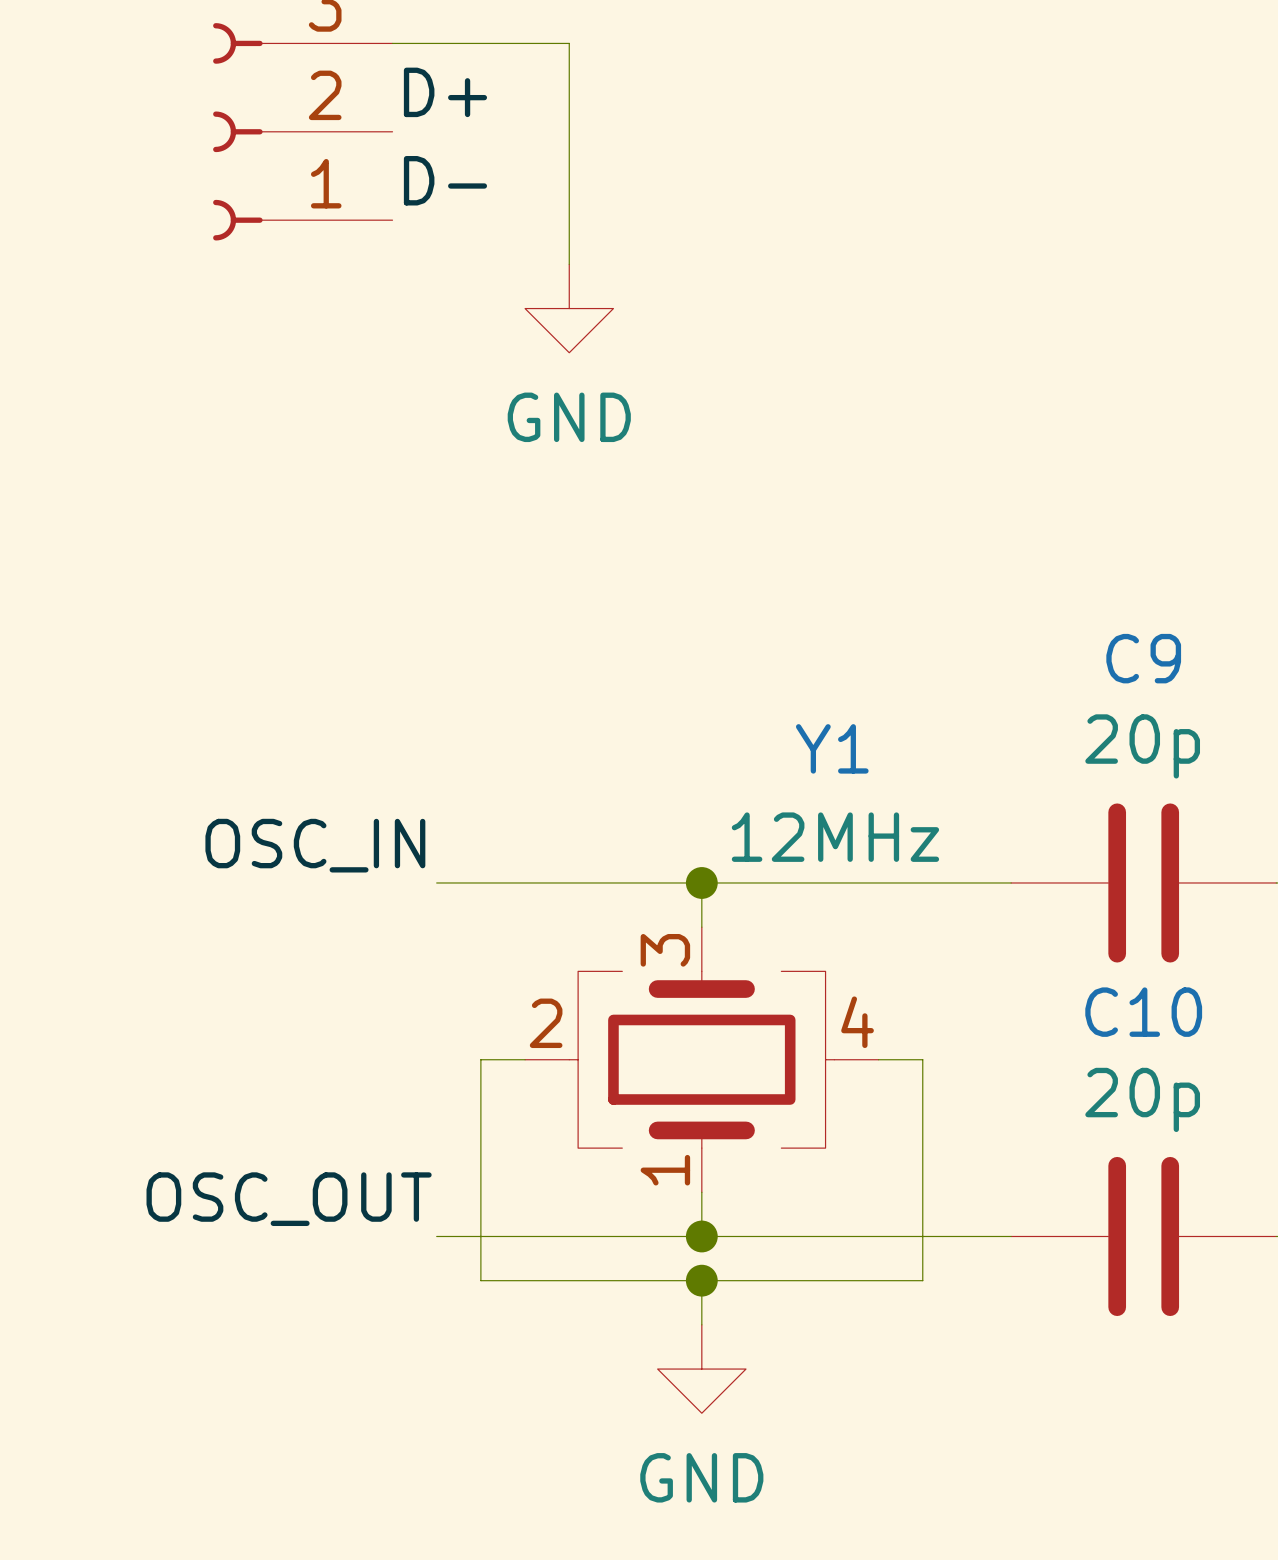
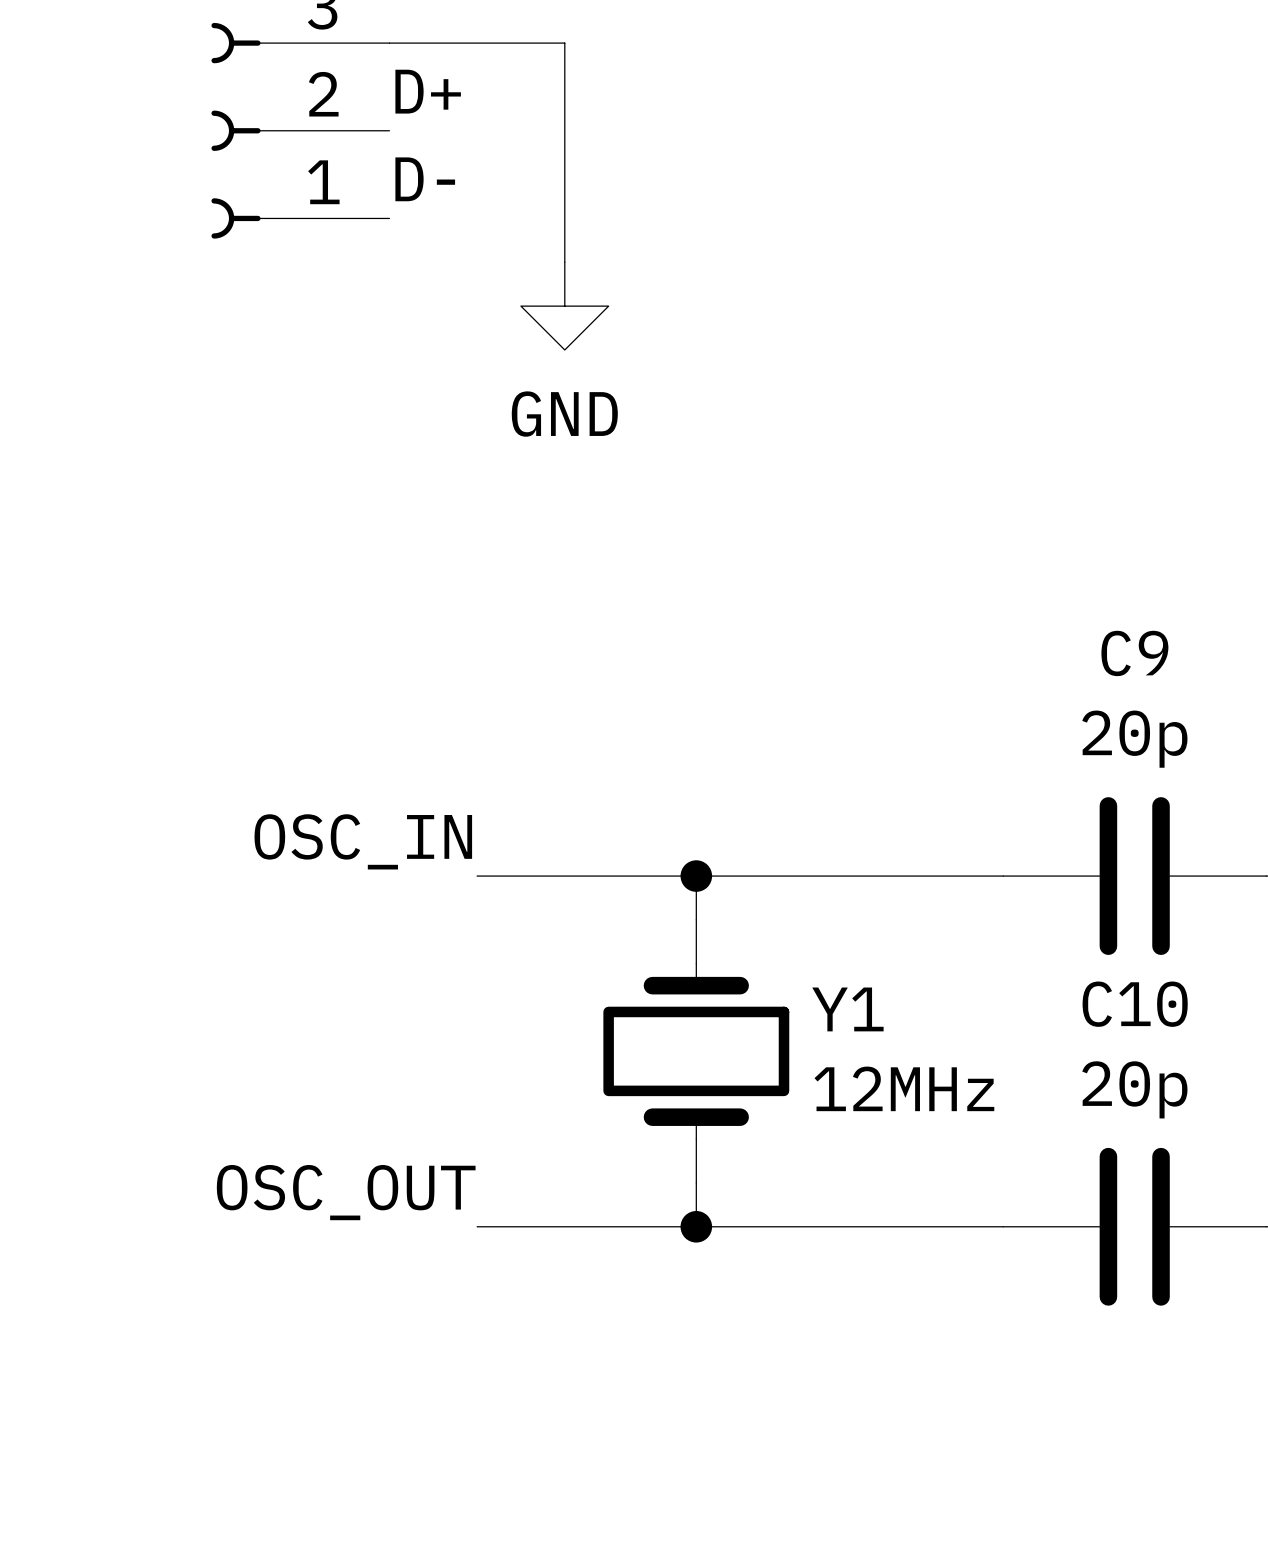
Y1 name position: Y1 (832, 748) -> Y1 (847, 1009)
Y1 value position: 12MHz (835, 837) -> 12MHz (904, 1088)
label position: OSC_IN (315, 845) -> OSC_IN (363, 841)
wire: (436, 882) (480, 882) -> none
Y1 symbol: [525, 927, 879, 1193] -> [603, 919, 790, 1183]
wire: (525, 1059) (480, 1059) (480, 1280) (922, 1280) (922, 1059) (878, 1059) -> none
label position: OSC_OUT (289, 1199) -> OSC_OUT (346, 1192)
wire: (436, 1236) (480, 1236) -> none
wire: (701, 1280) (701, 1324) -> none
junction: (701, 1280) -> none
power symbol: GND (701, 1369) -> none

